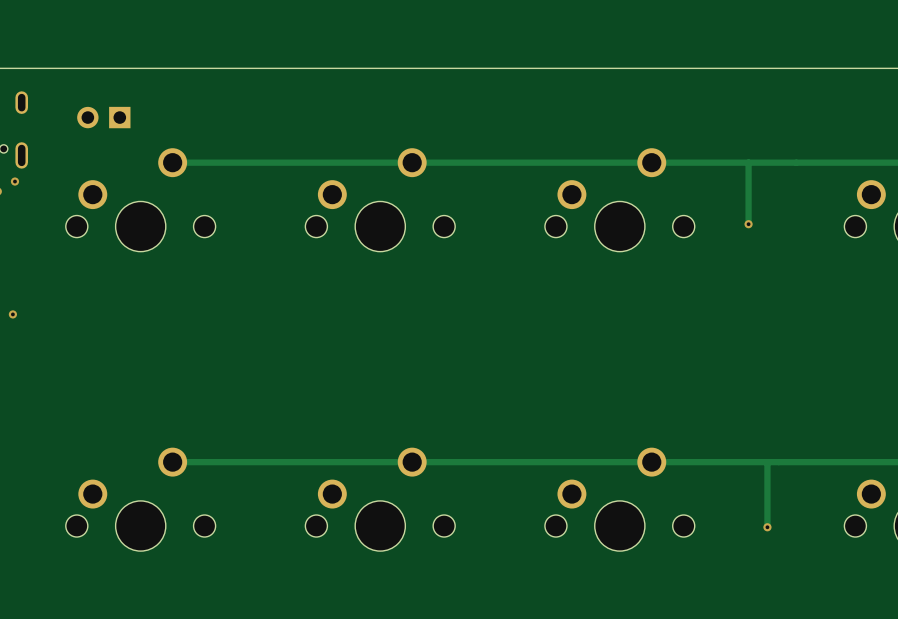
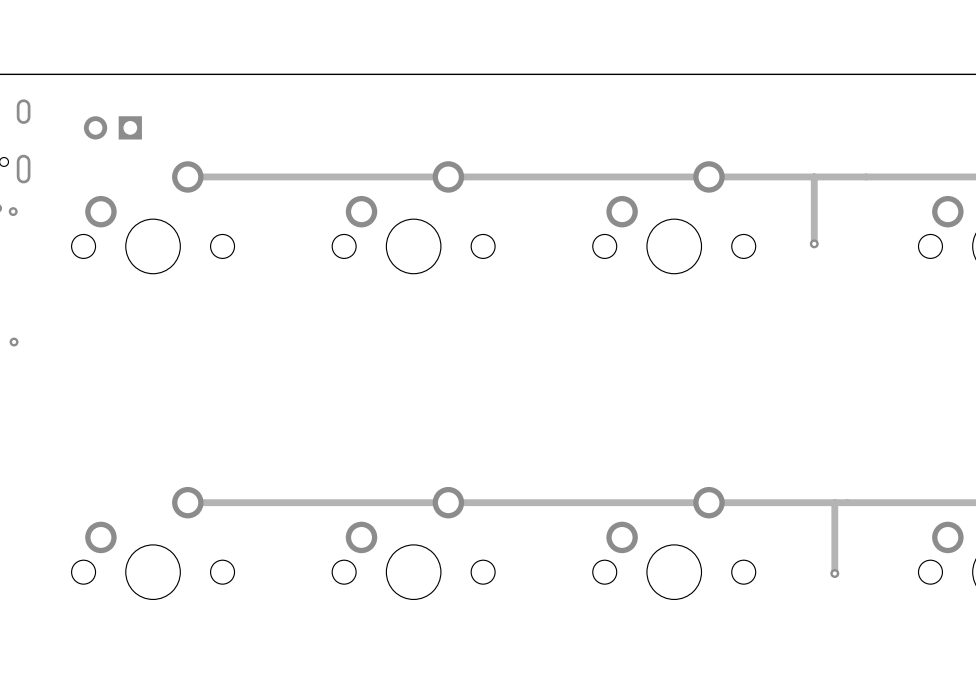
via position: (14, 181) -> (13, 211)

